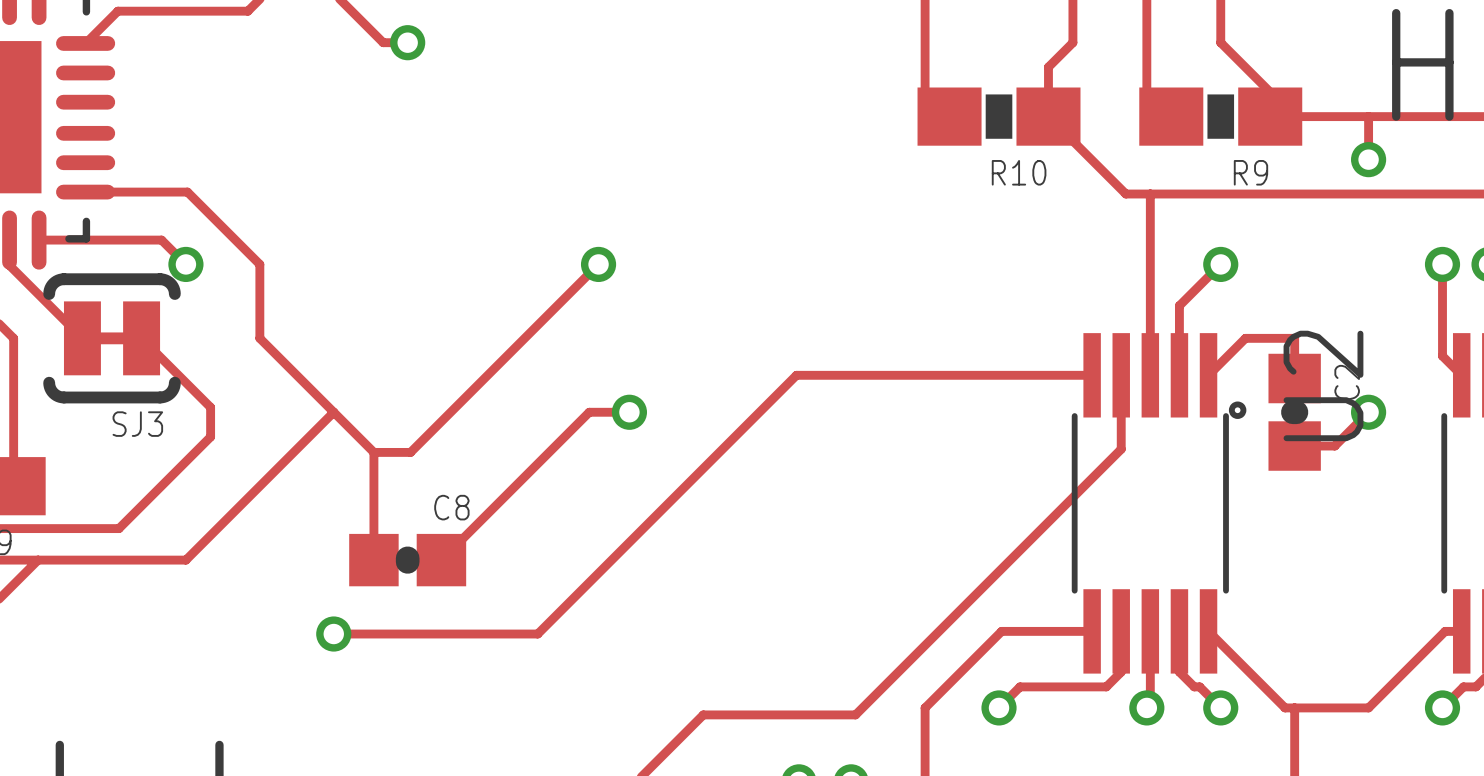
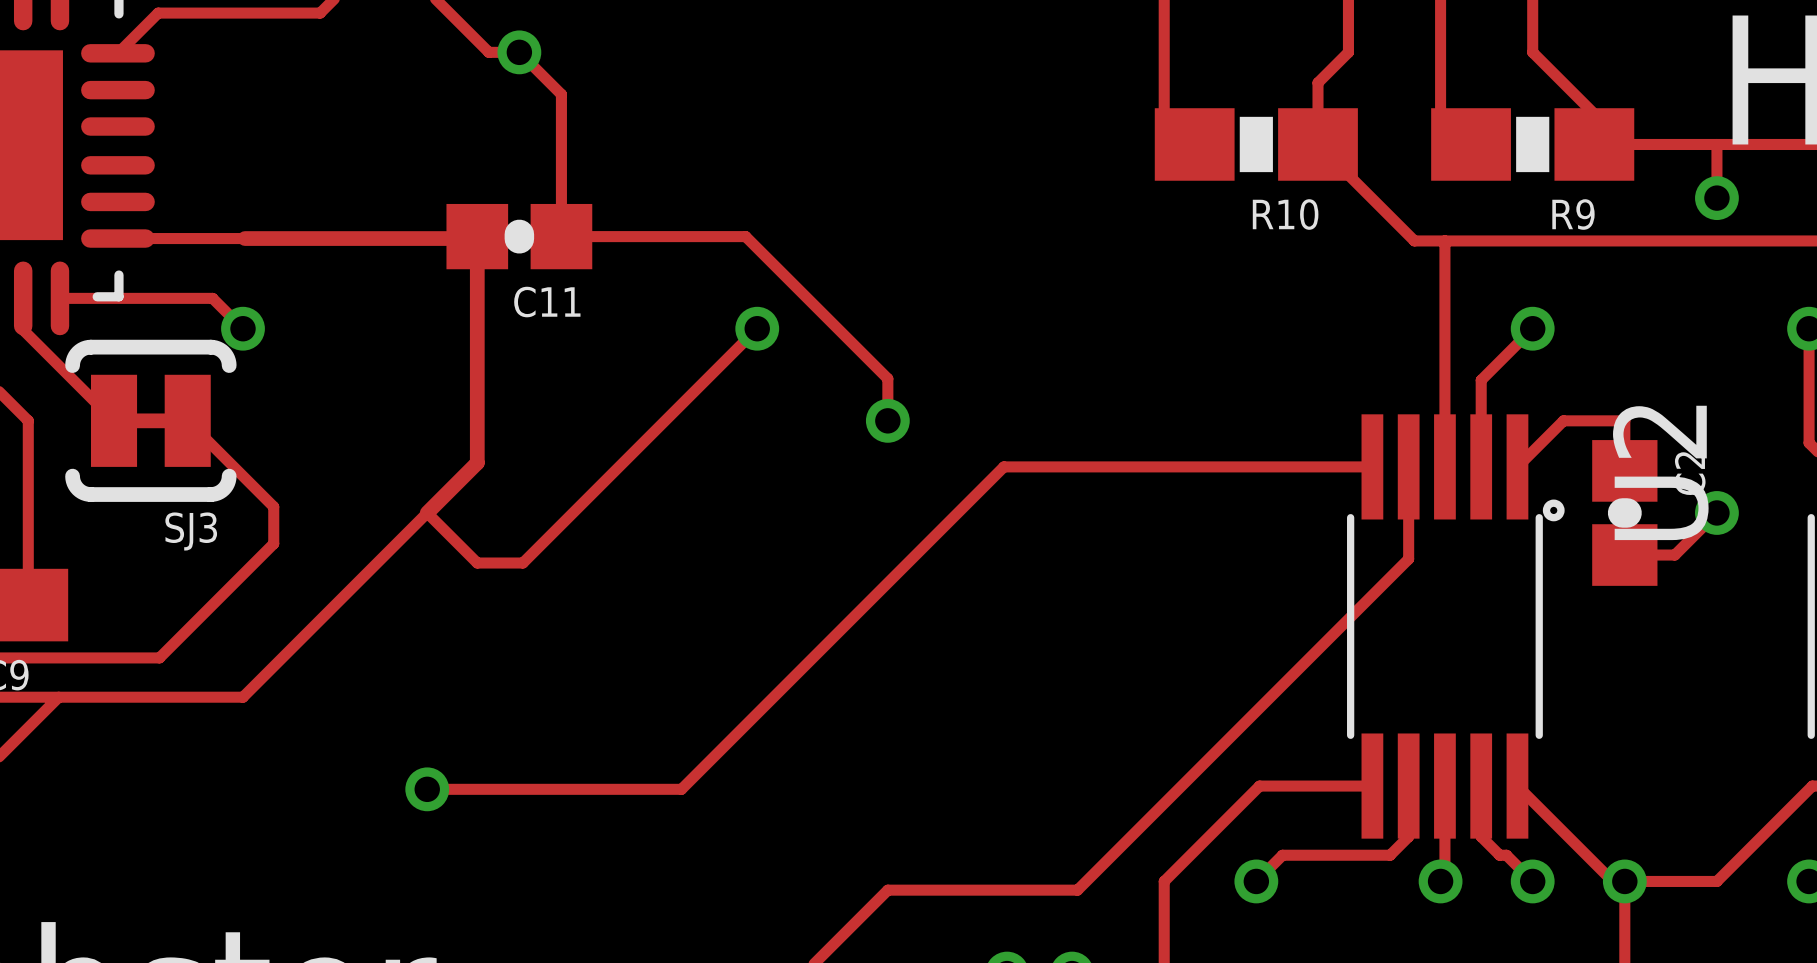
track: none -> (519, 52) (561, 94) (561, 236) (745, 236) (887, 378) (887, 420)
C11: none -> (519, 236)
track: (187, 192) (259, 264) (259, 338) (333, 412) -> (244, 238) (475, 238) (477, 236) (477, 462) (427, 512)
track: (629, 412) (589, 412) (441, 560) (457, 575) -> none
via position: (629, 412) -> (887, 420)
track: (373, 452) (373, 560) -> none
C8: (407, 560) -> none
via: none -> (1624, 881)

